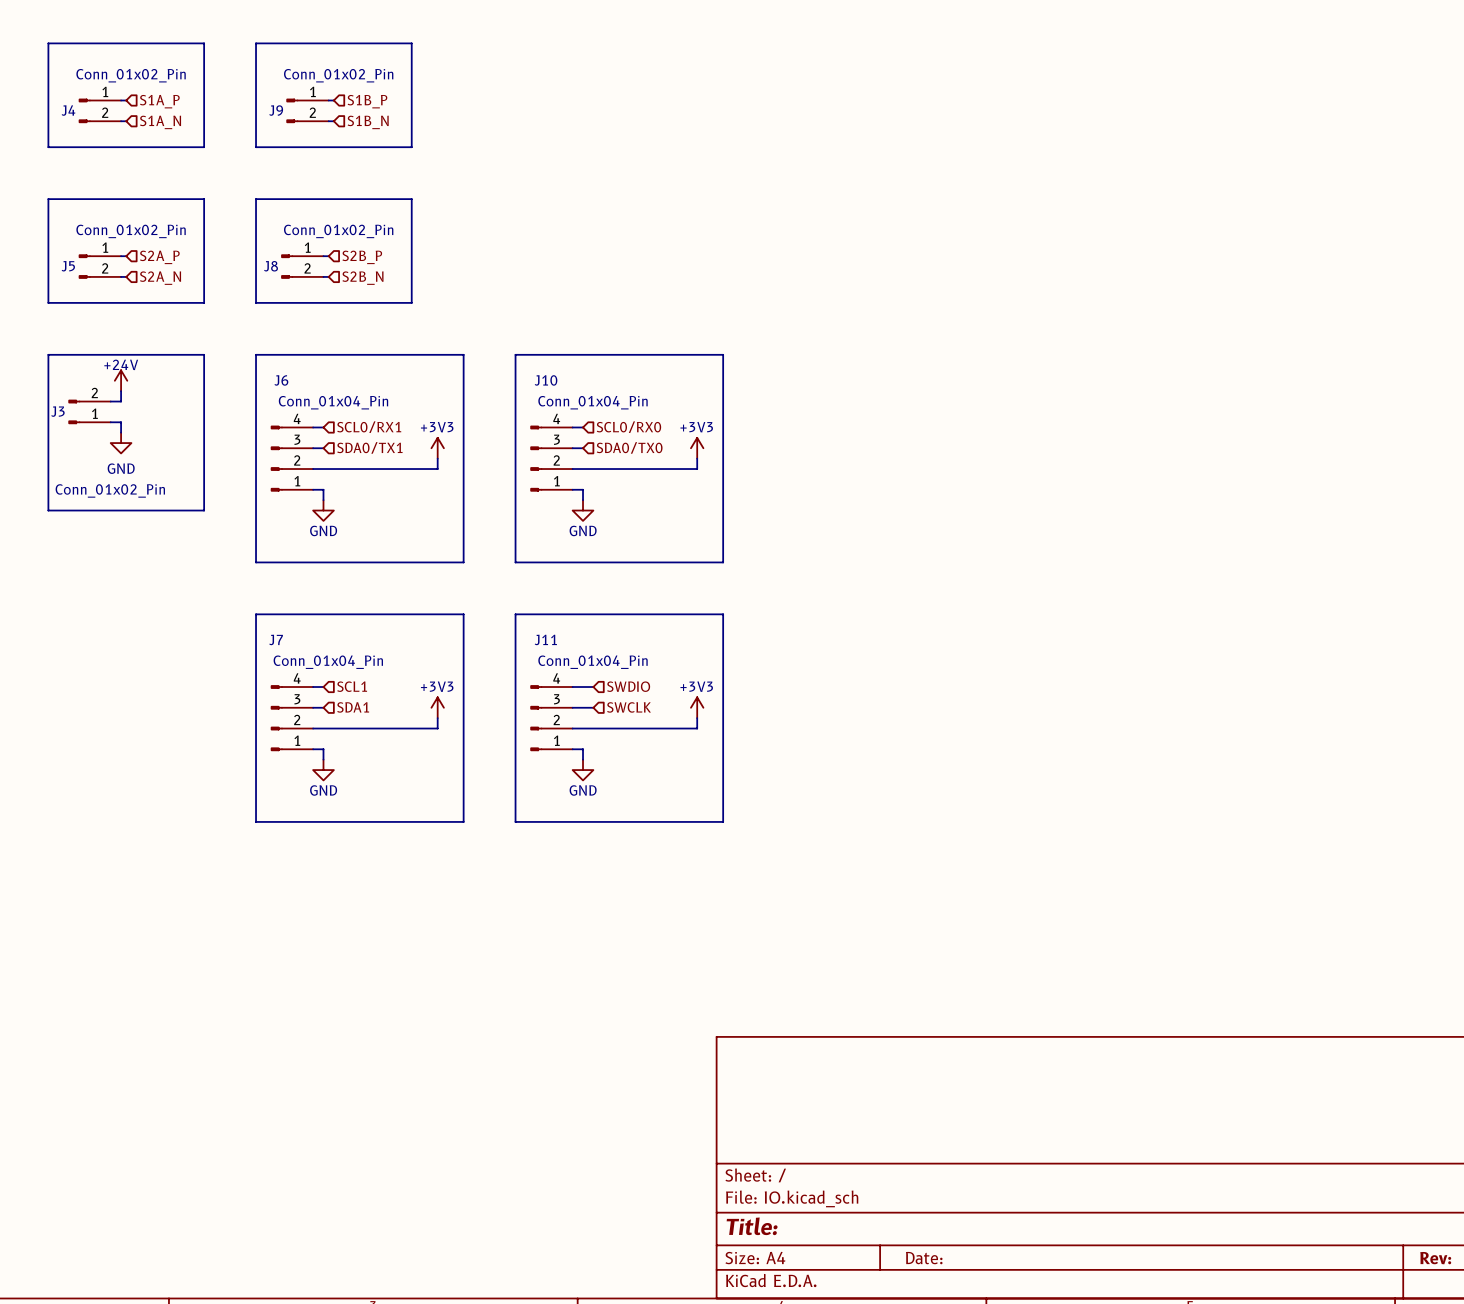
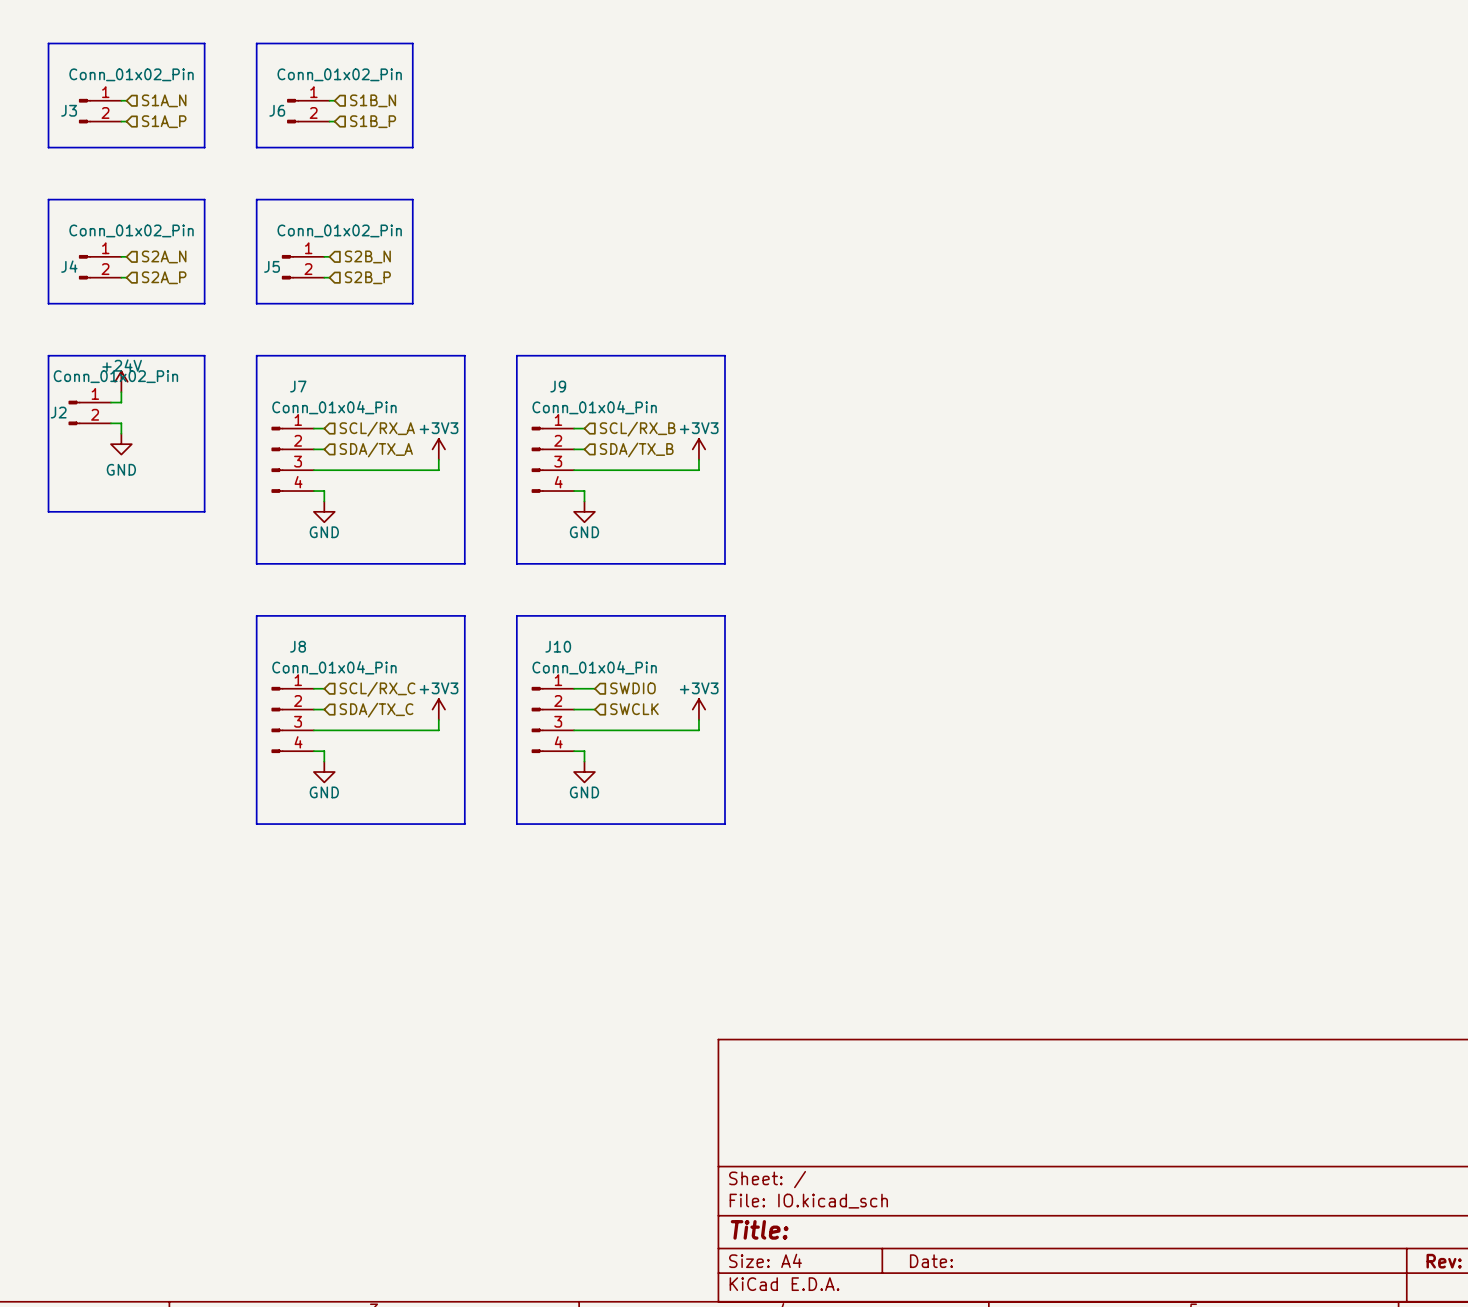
hierarchical label: S1A_P (159, 101) -> S1A_N (164, 100)
hierarchical label: S1B_P (367, 101) -> S1B_N (373, 100)
J4 name: J4 (68, 110) -> J3 (69, 110)
J9 name: J9 (276, 110) -> J6 (277, 110)
hierarchical label: S1A_N (160, 122) -> S1A_P (164, 121)
hierarchical label: S1B_N (368, 122) -> S1B_P (373, 121)
hierarchical label: S2A_P (159, 257) -> S2A_N (164, 256)
hierarchical label: S2B_P (362, 257) -> S2B_N (367, 256)
J5 name: J5 (68, 266) -> J4 (69, 266)
J8 name: J8 (271, 266) -> J5 (272, 266)
hierarchical label: S2A_N (160, 278) -> S2A_P (164, 277)
hierarchical label: S2B_N (362, 278) -> S2B_P (367, 277)
J3 name: J3 (57, 411) -> J2 (58, 412)
J3 flip: as is (74, 411) -> up-down (74, 412)
hierarchical label: SCL0/RX1 (369, 427) -> SCL/RX_A (377, 429)
hierarchical label: SCL0/RX0 (628, 427) -> SCL/RX_B (637, 429)
hierarchical label: SDA0/TX1 (369, 447) -> SDA/TX_A (376, 449)
hierarchical label: SDA0/TX0 (629, 447) -> SDA/TX_B (636, 449)
J6: Conn_01x04_Pin (292, 458) -> none
J10 flip: as is (536, 458) -> up-down (537, 719)
J10 position: (551, 458) -> (552, 719)
J9: none -> Conn_01x04_Pin (552, 459)
J3 value position: Conn_01x02_Pin (110, 490) -> Conn_01x02_Pin (115, 376)
J7 name position: J7 (276, 639) -> J7 (298, 386)
hierarchical label: SCL1 (352, 686) -> SCL/RX_C (377, 689)
hierarchical label: SDA1 (353, 707) -> SDA/TX_C (376, 710)
J7 flip: as is (276, 718) -> up-down (277, 459)
J7 position: (292, 718) -> (292, 459)
J8: none -> Conn_01x04_Pin (292, 719)
J11: Conn_01x04_Pin (551, 718) -> none

